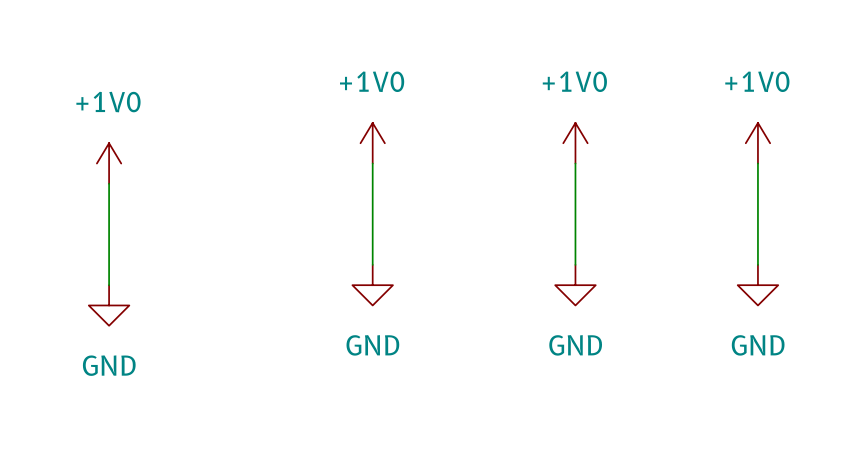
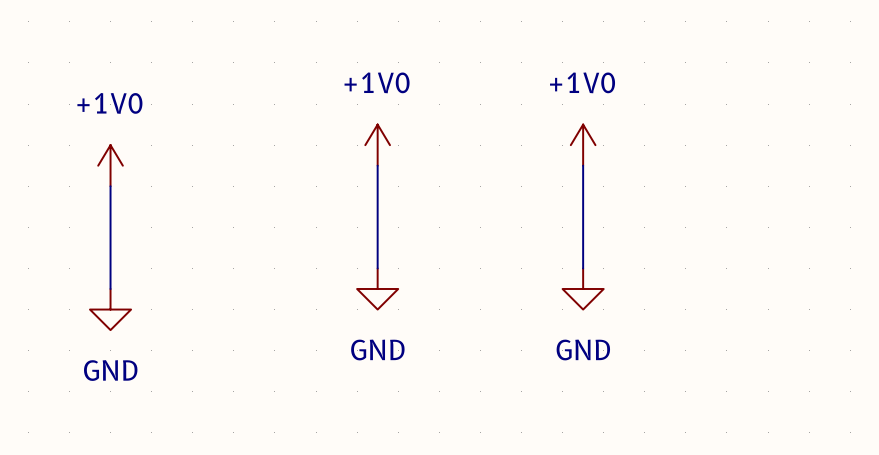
power symbol: +1V0 (757, 143) -> none
wire: (757, 163) (757, 264) -> none
power symbol: GND (757, 285) -> none

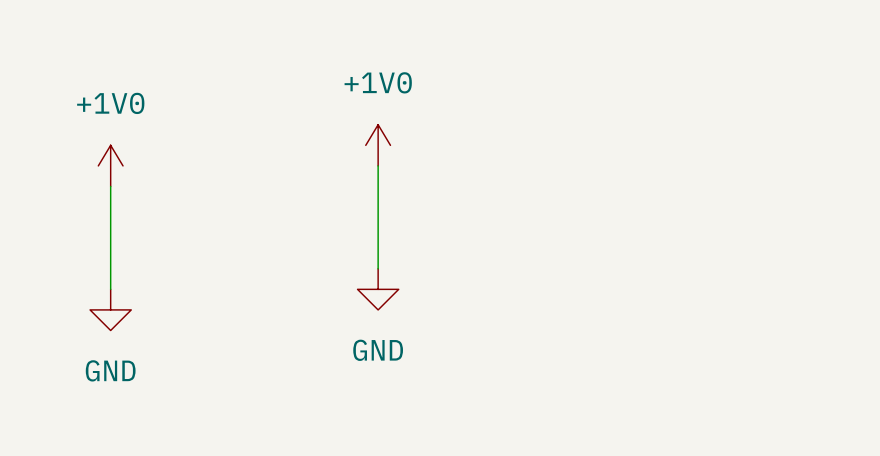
power symbol: +1V0 (583, 145) -> none
wire: (583, 165) (583, 268) -> none
power symbol: GND (583, 288) -> none

